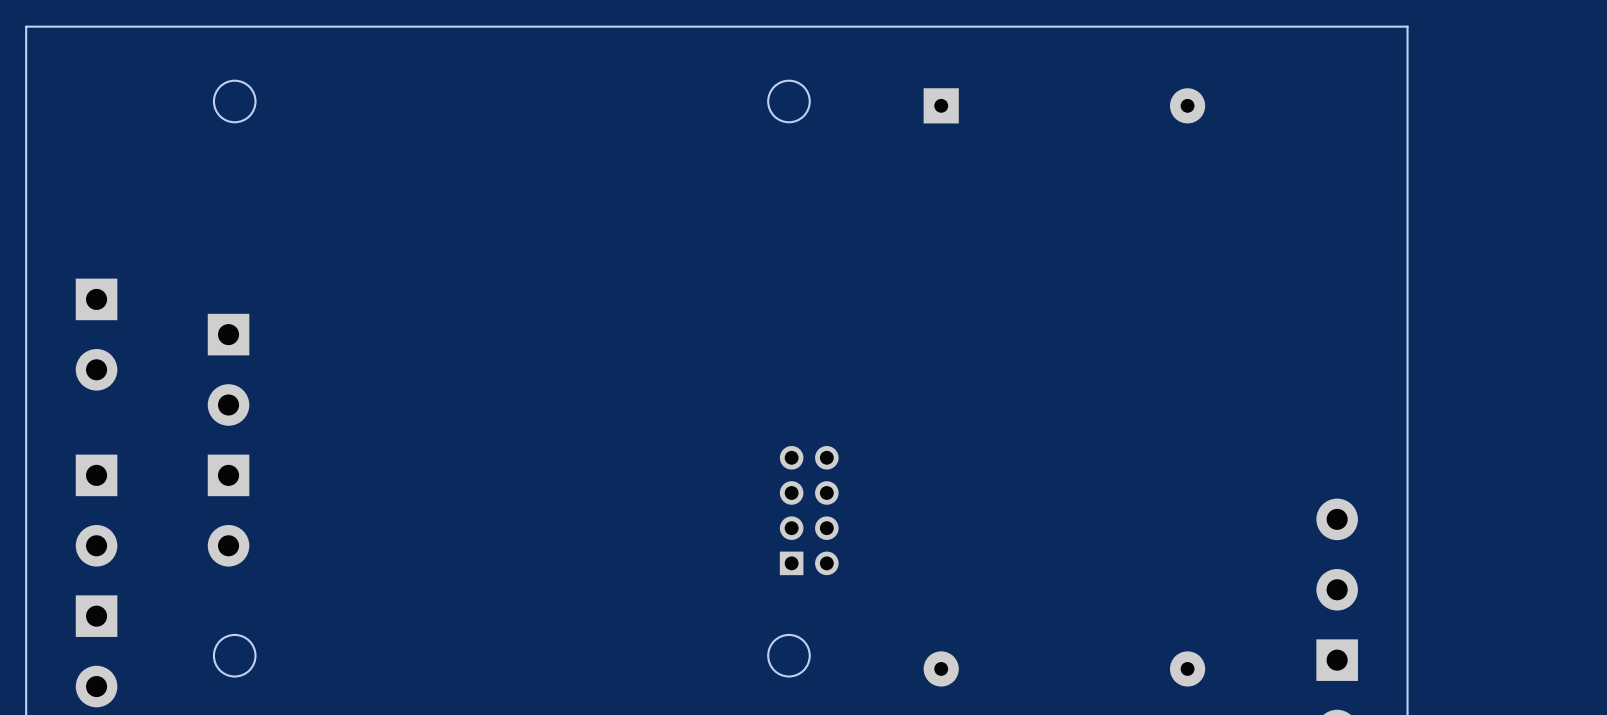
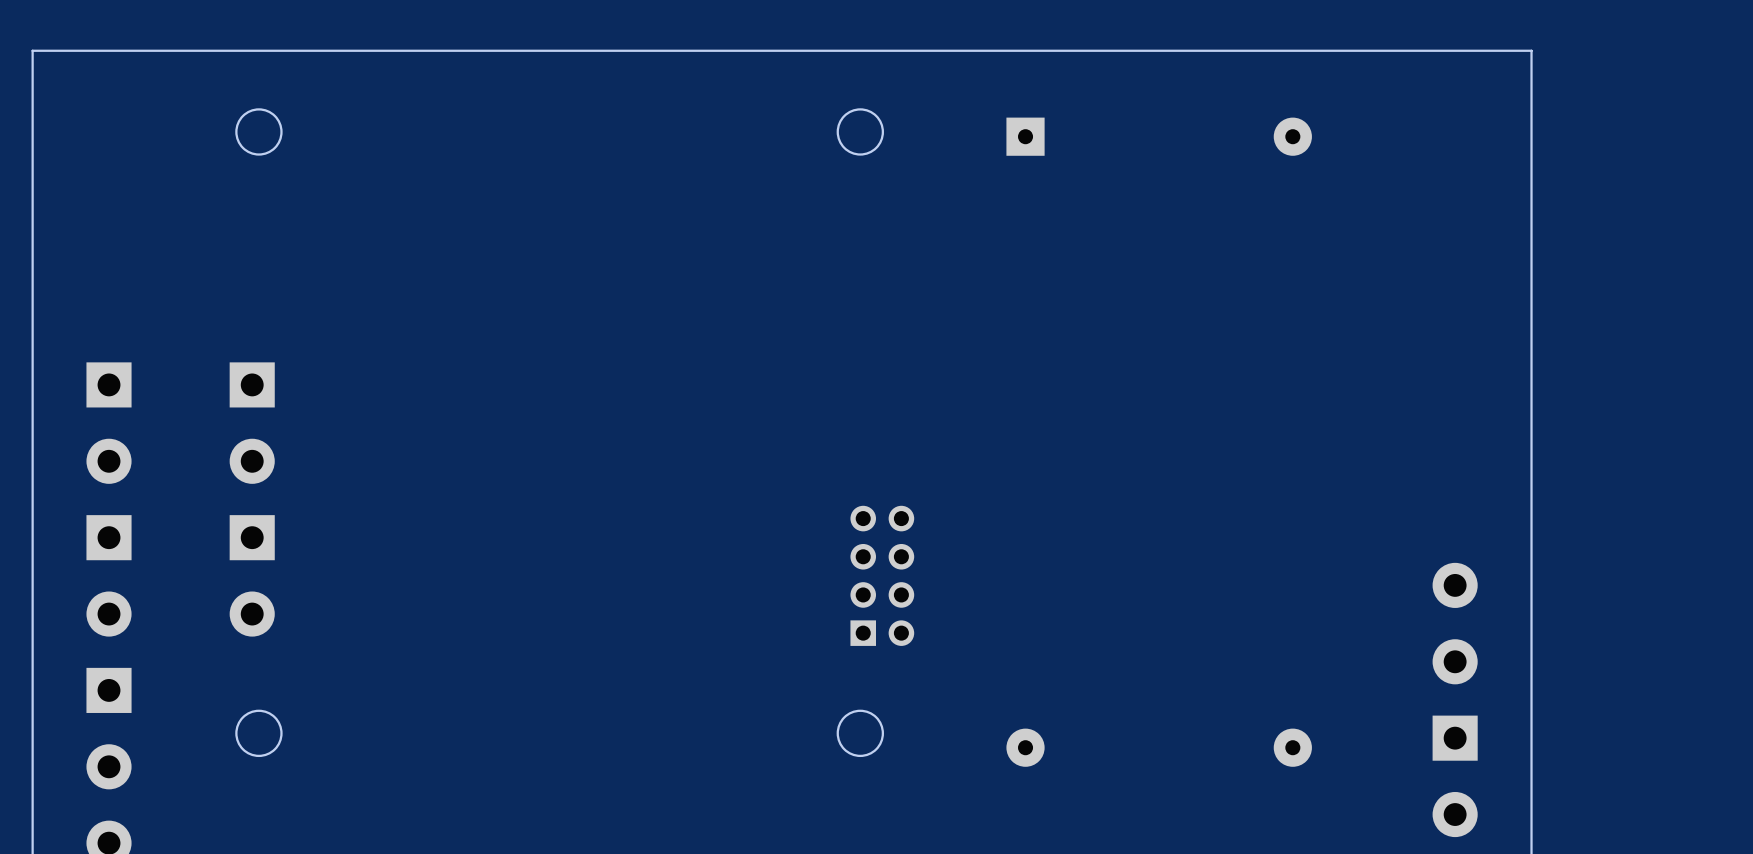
part position: (96, 334) -> (109, 423)

